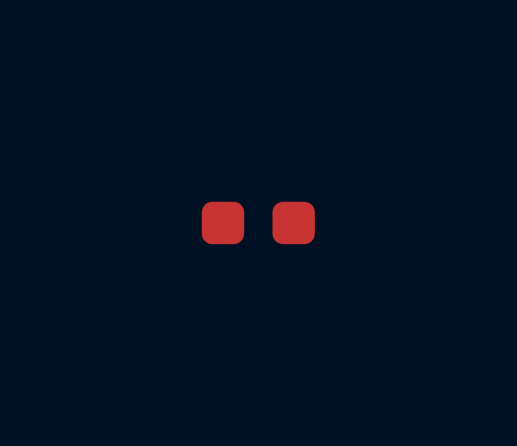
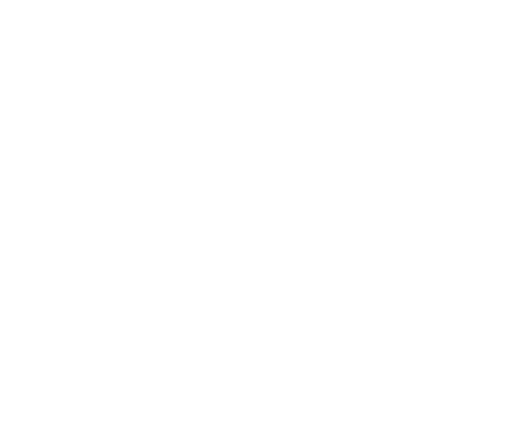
part: (258, 222) -> none

